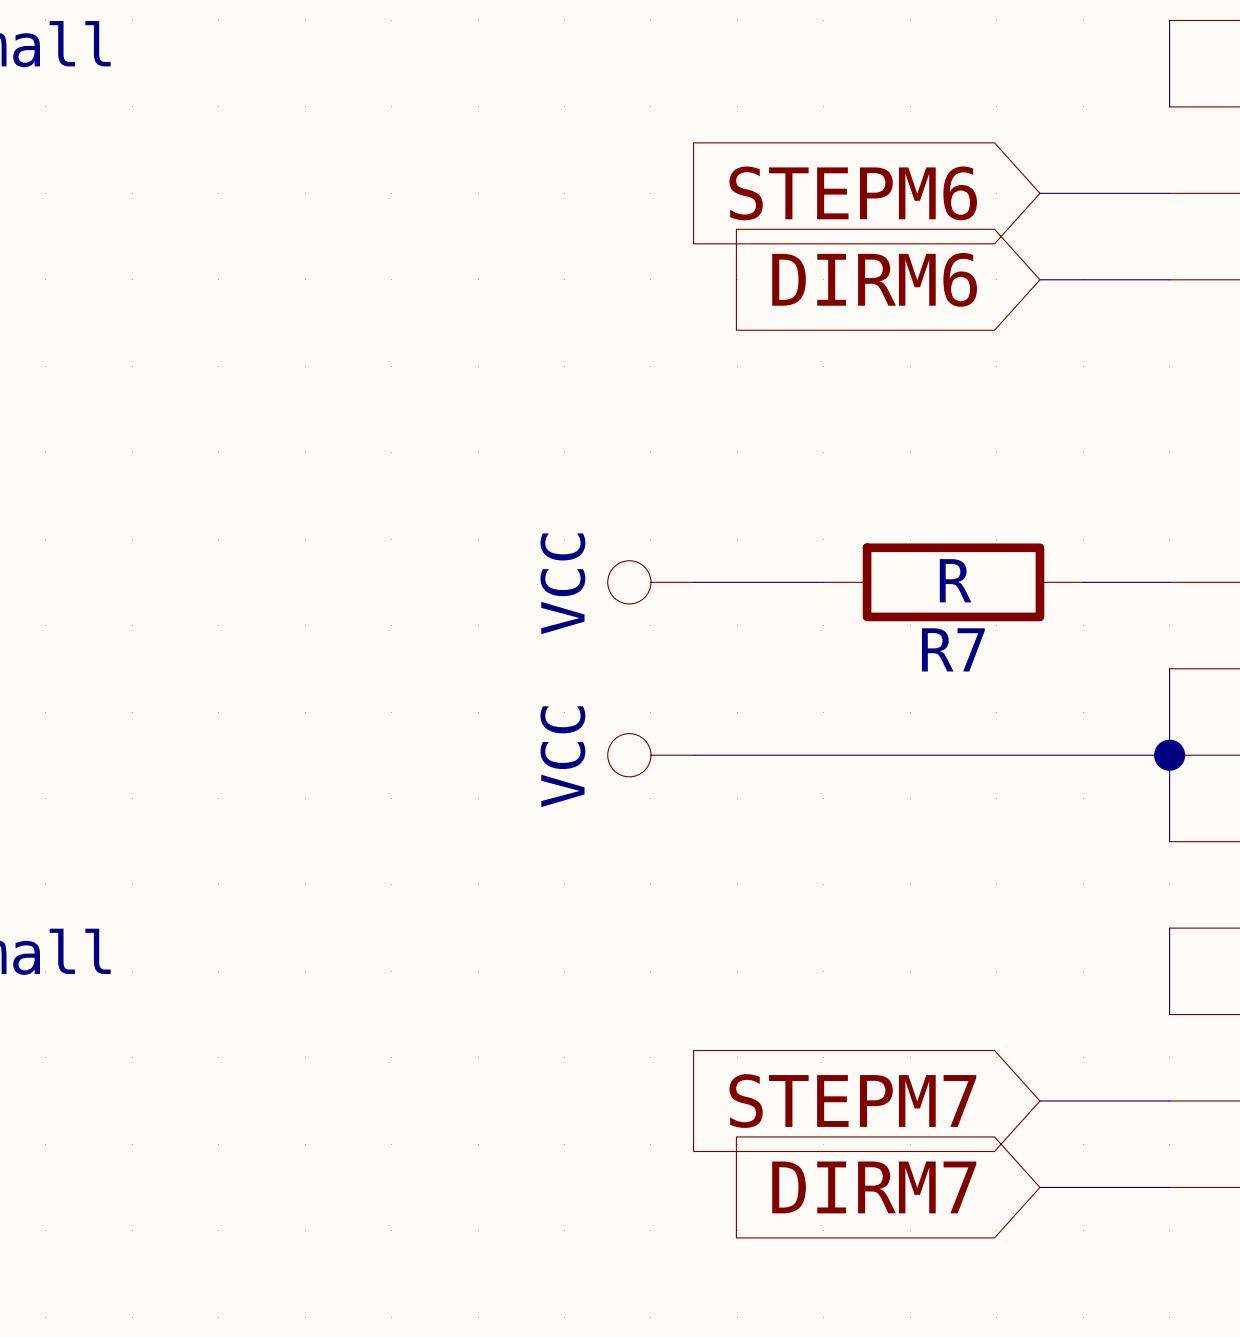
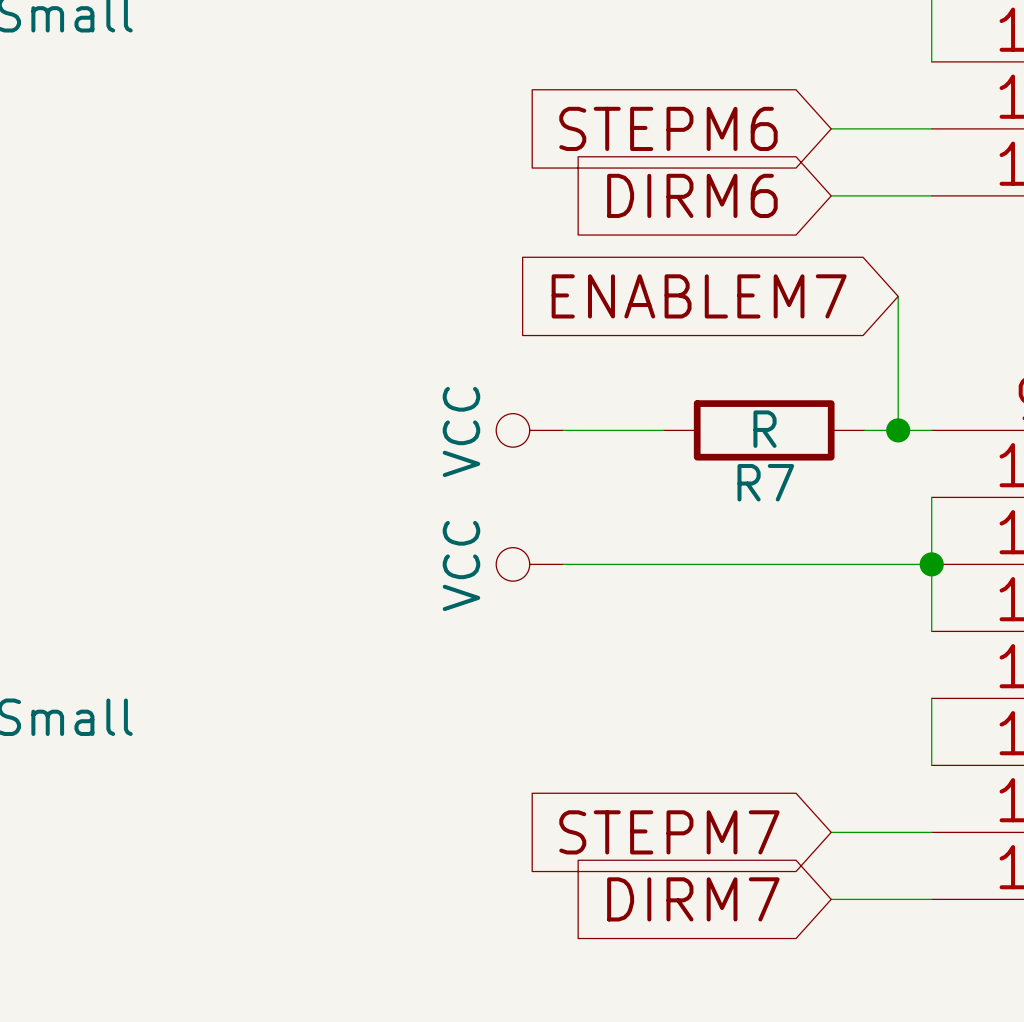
global label: none -> ENABLEM7 (699, 296)
wire: none -> (898, 296) (898, 430)
junction: none -> (898, 430)

